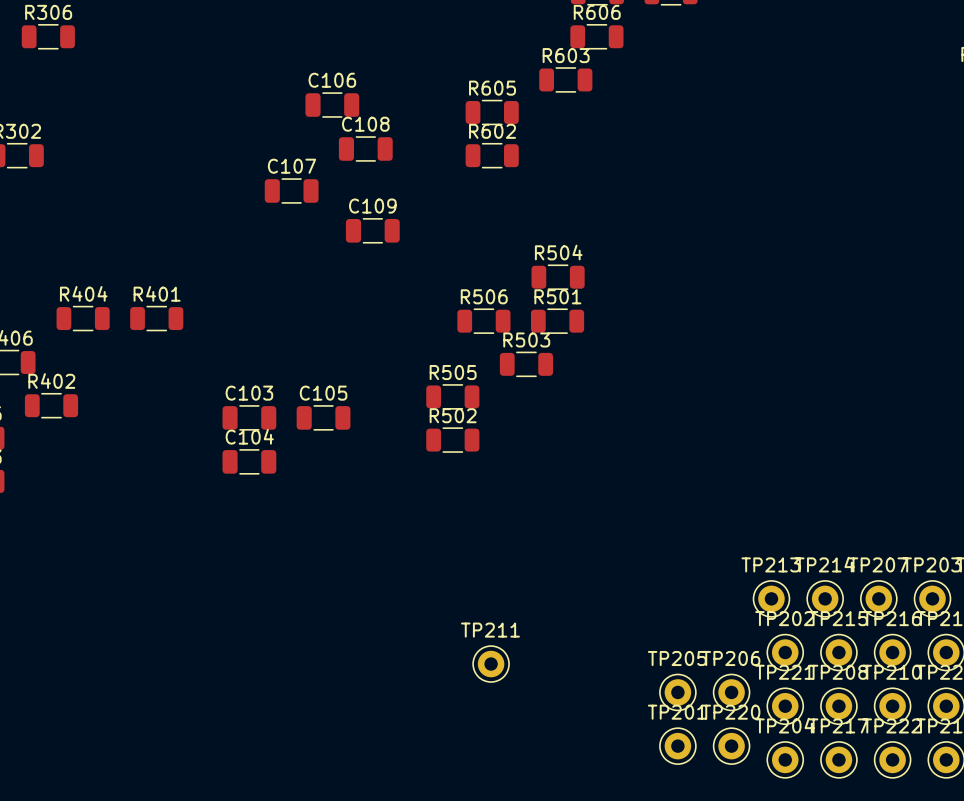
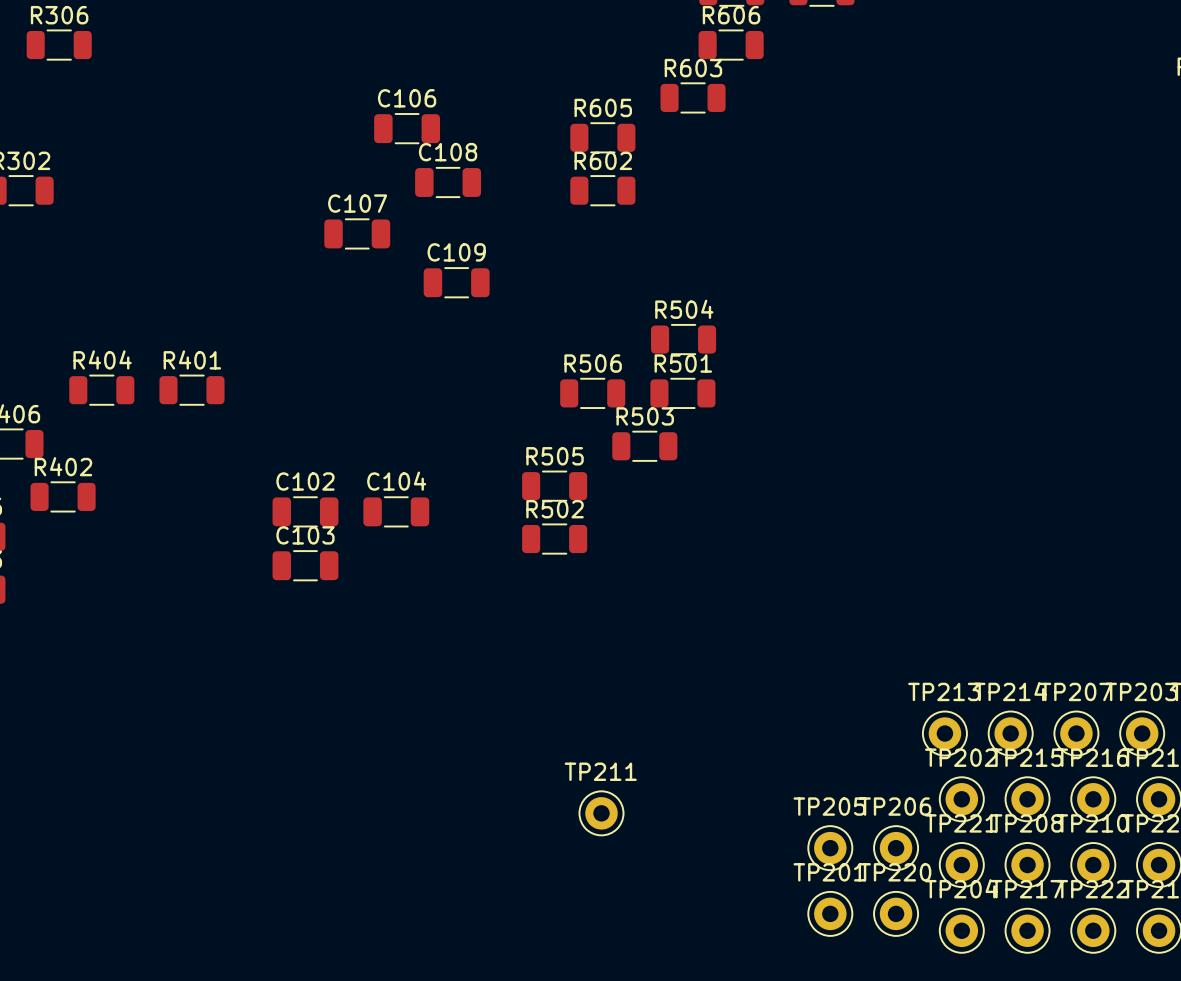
C103 name: C103 (249, 393) -> C102 (305, 481)
C105 name: C105 (323, 393) -> C104 (396, 481)
C104 name: C104 (249, 436) -> C103 (305, 535)

